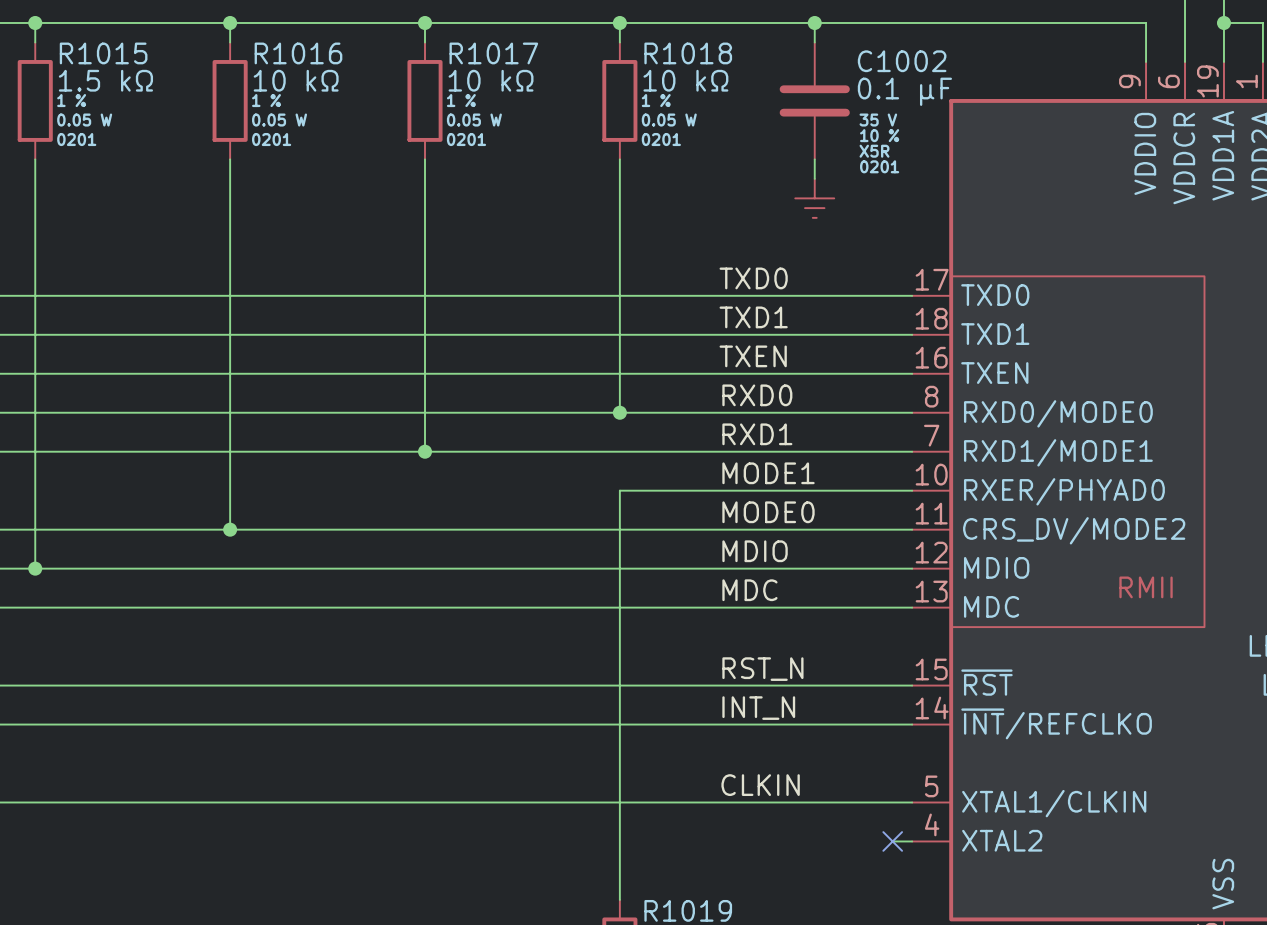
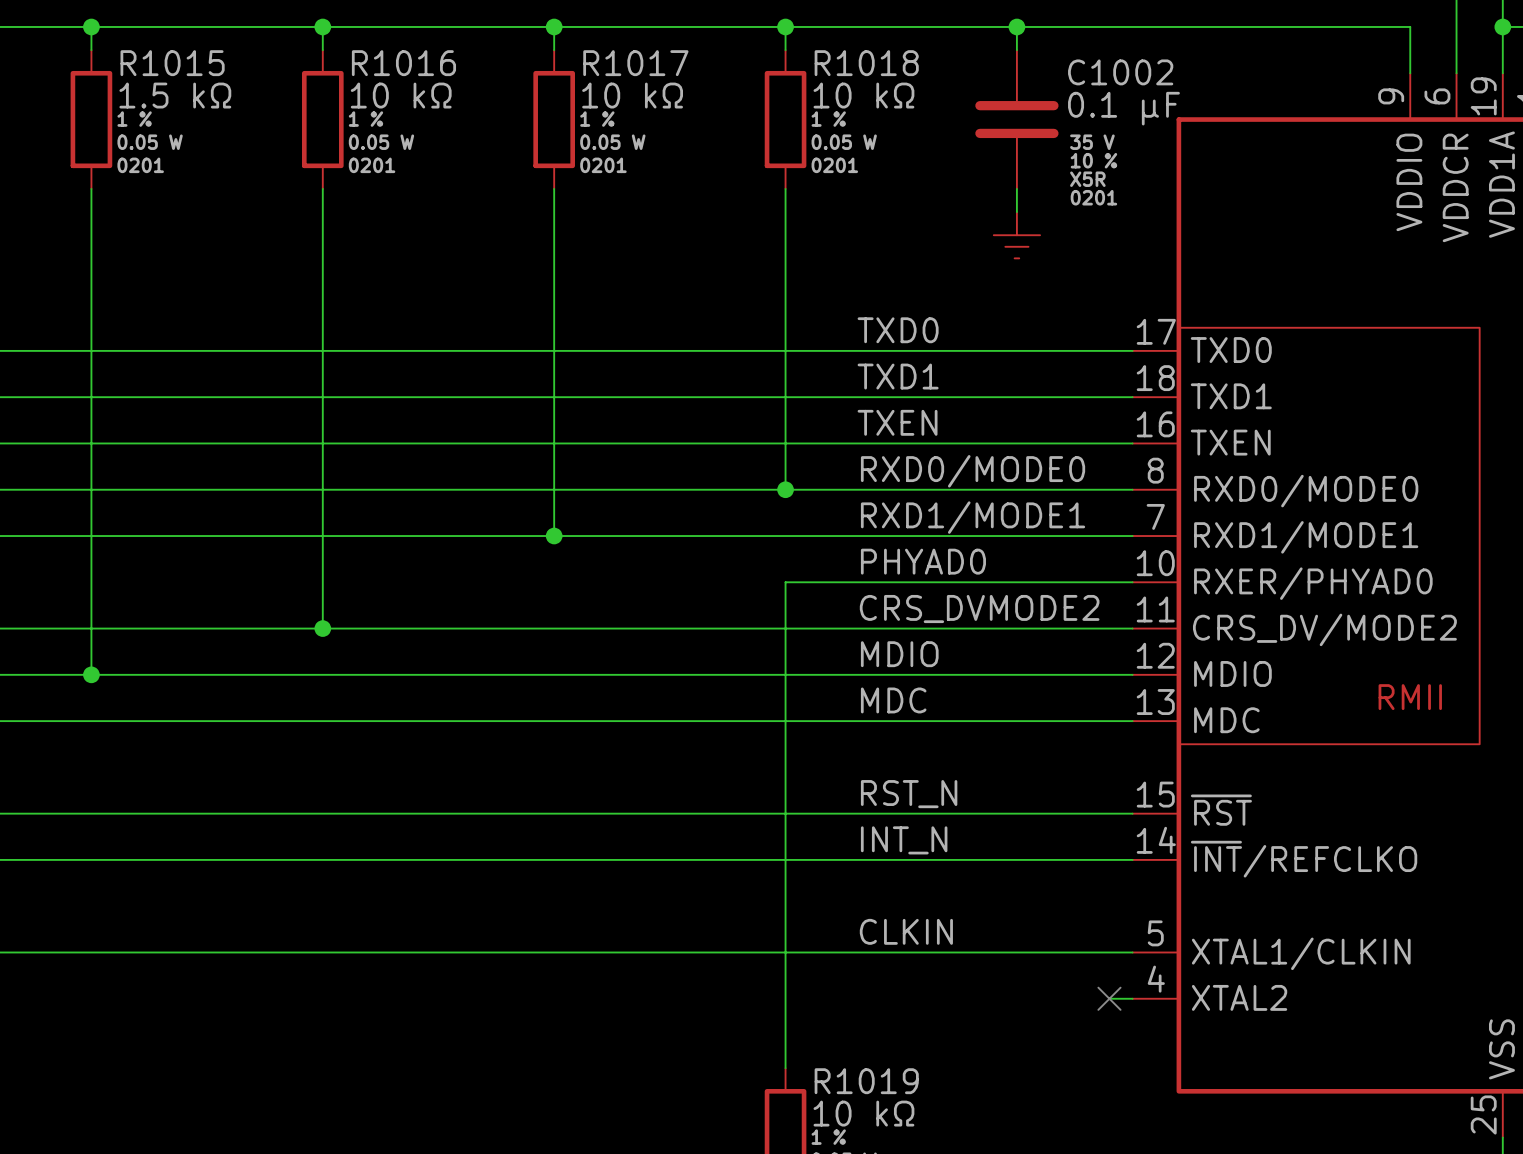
label position: TXD0 (753, 278) -> TXD0 (898, 330)
label position: TXD1 (753, 317) -> TXD1 (898, 376)
label position: TXEN (753, 356) -> TXEN (897, 422)
label: RXD0 (757, 395) -> none
label: none -> RXD0/MODE0 (973, 471)
label: RXD1 (757, 434) -> none
label: none -> PHYAD0 (923, 561)
label: MODE1 (768, 473) -> RXD1/MODE1 (973, 517)
label: MODE0 (768, 512) -> none
label: none -> CRS_DVMODE2 (979, 609)
label position: MDIO (755, 551) -> MDIO (899, 654)
label position: MDC (749, 590) -> MDC (893, 700)
label position: RST_N (762, 669) -> RST_N (909, 794)
label position: INT_N (758, 708) -> INT_N (904, 840)
label position: CLKIN (760, 785) -> CLKIN (906, 931)

